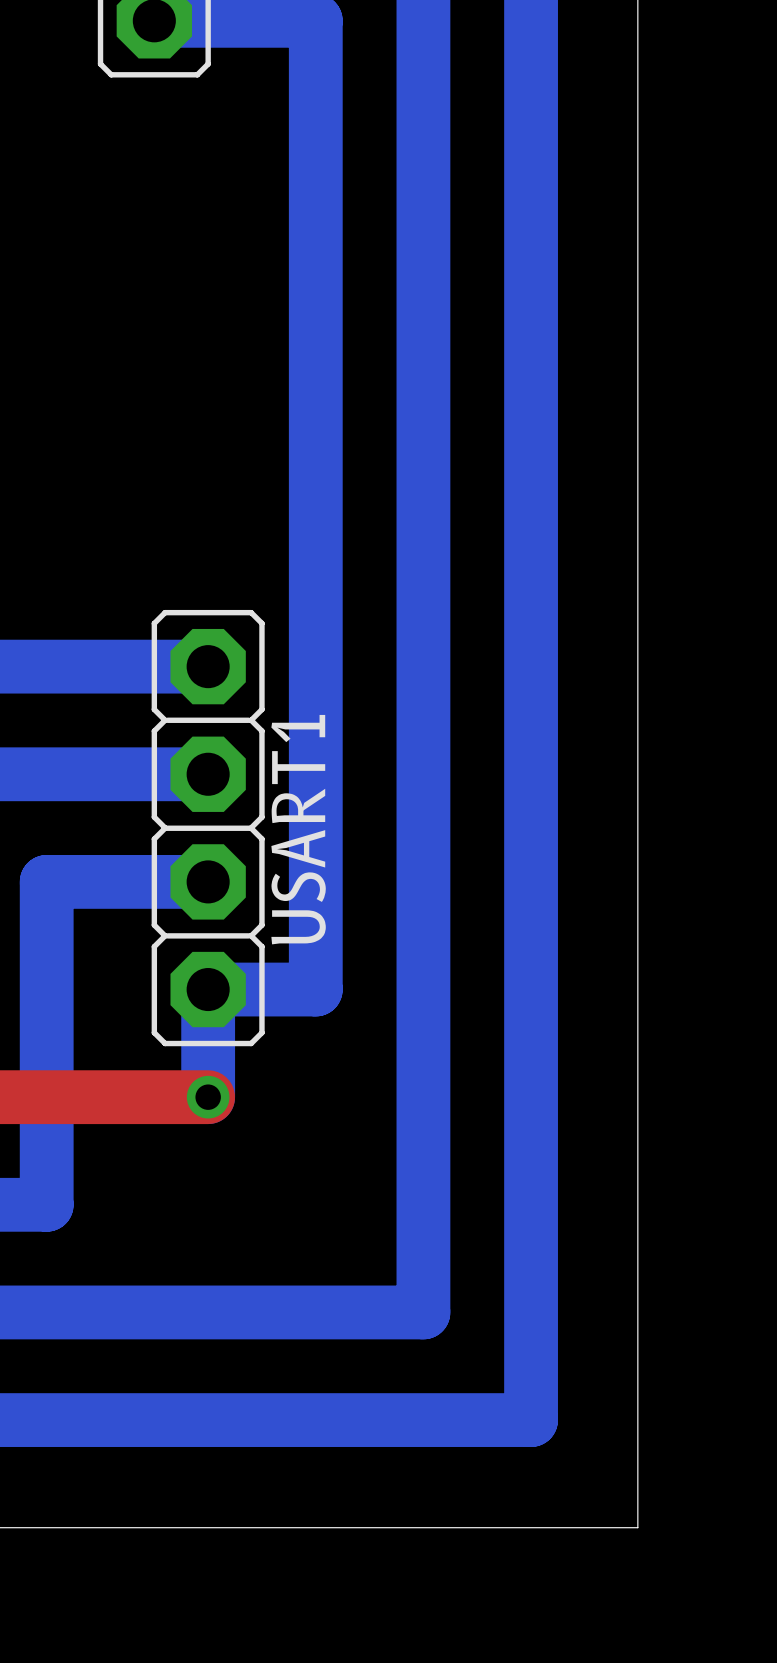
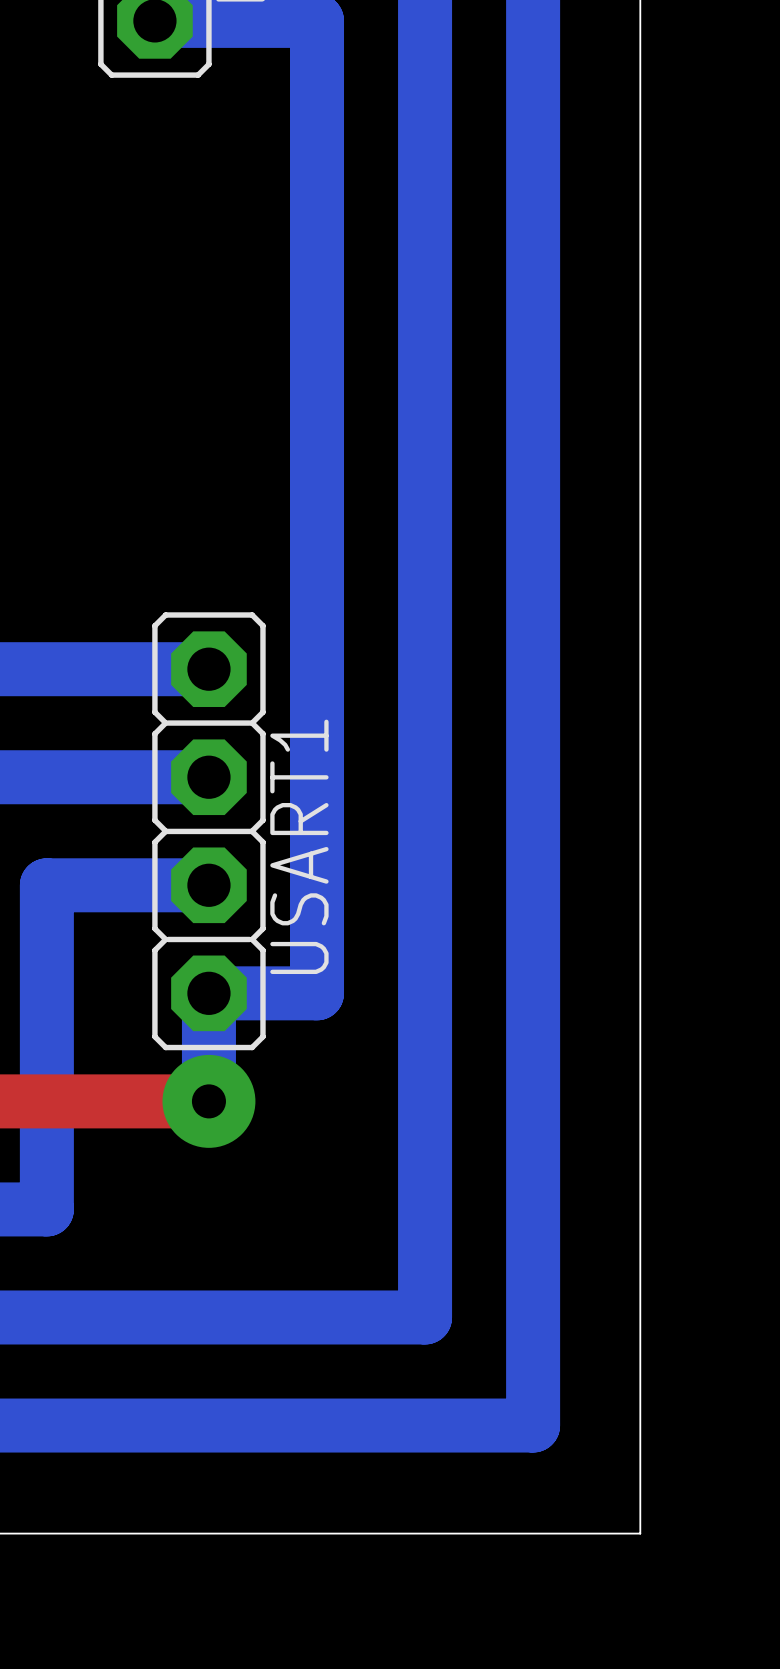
via size: [186, 1075, 230, 1119] -> [162, 1054, 256, 1148]

